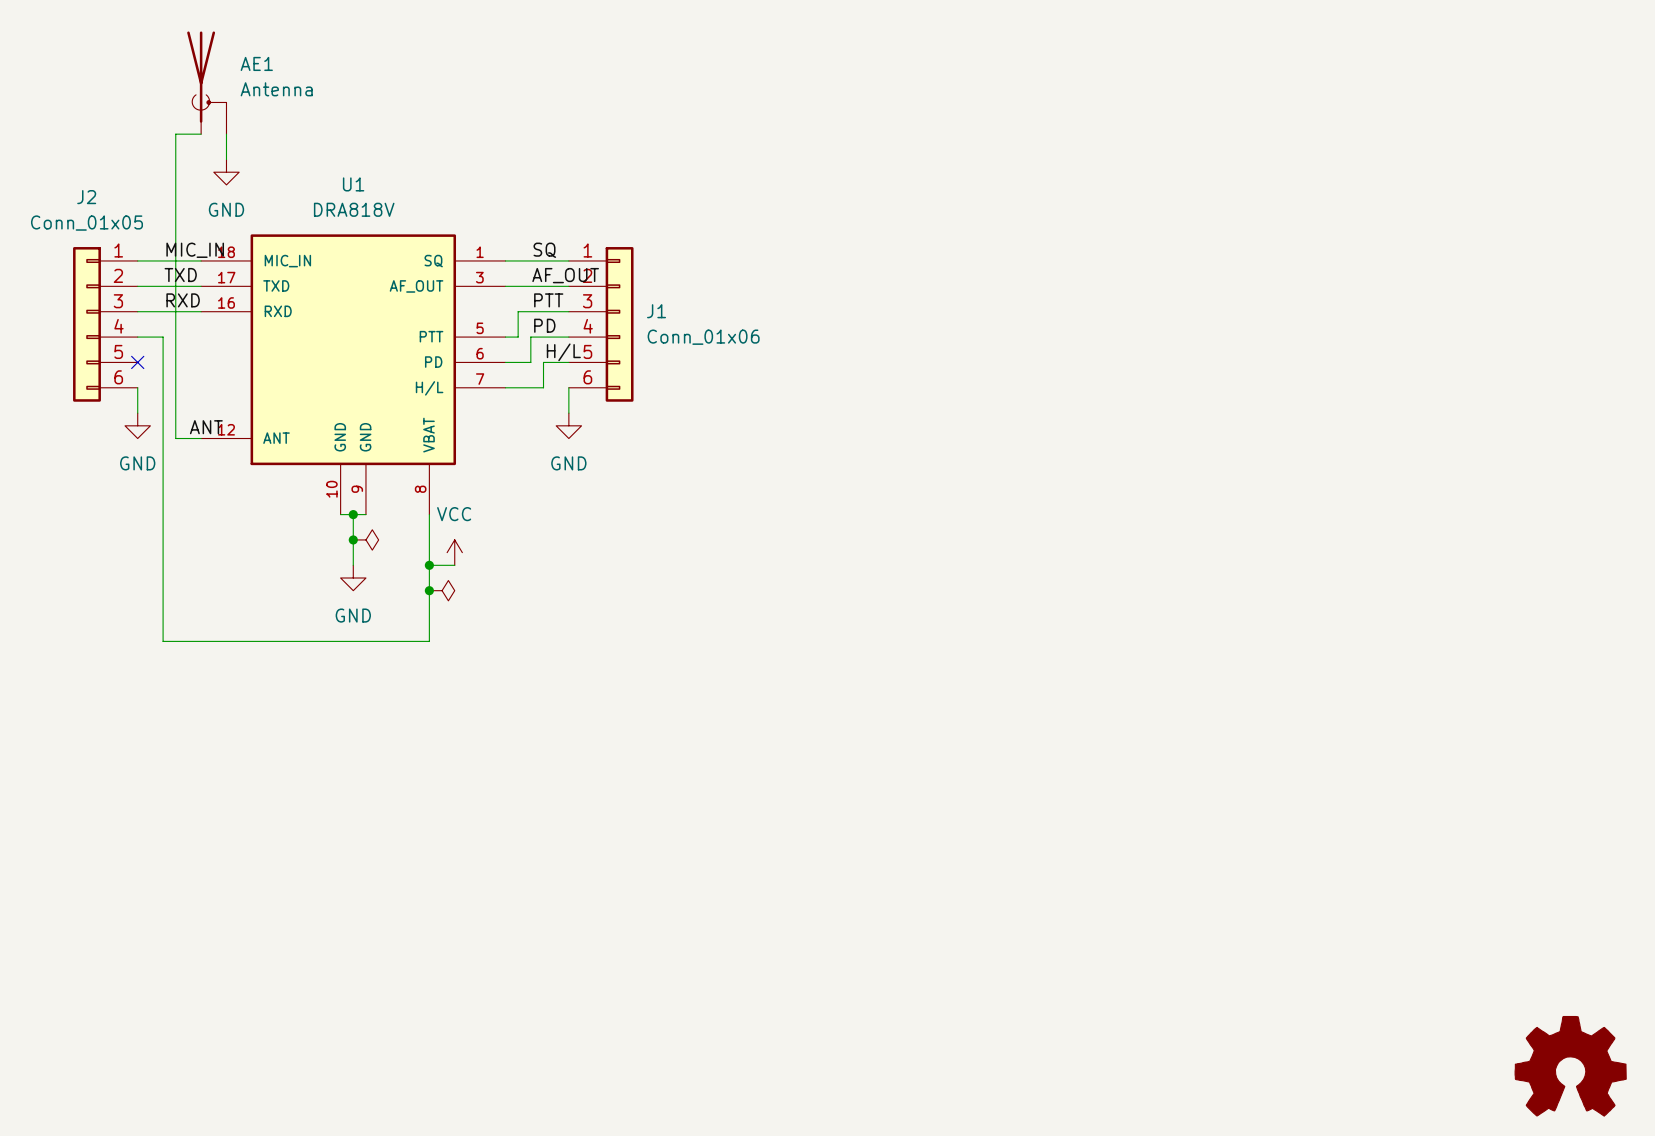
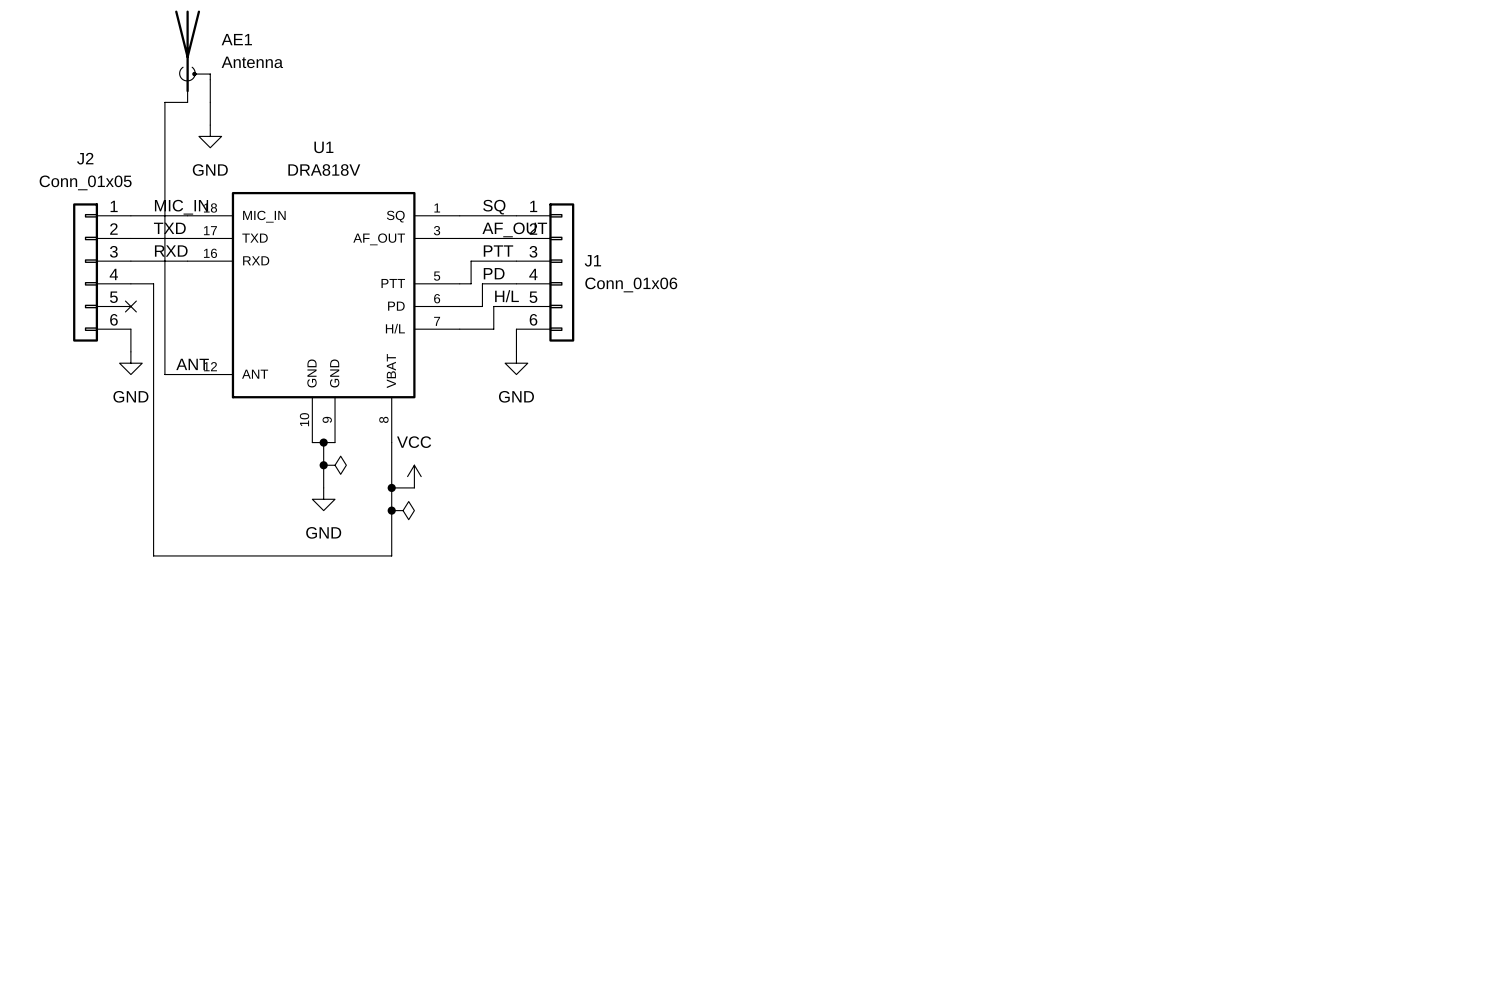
part: (1570, 1066) -> none

